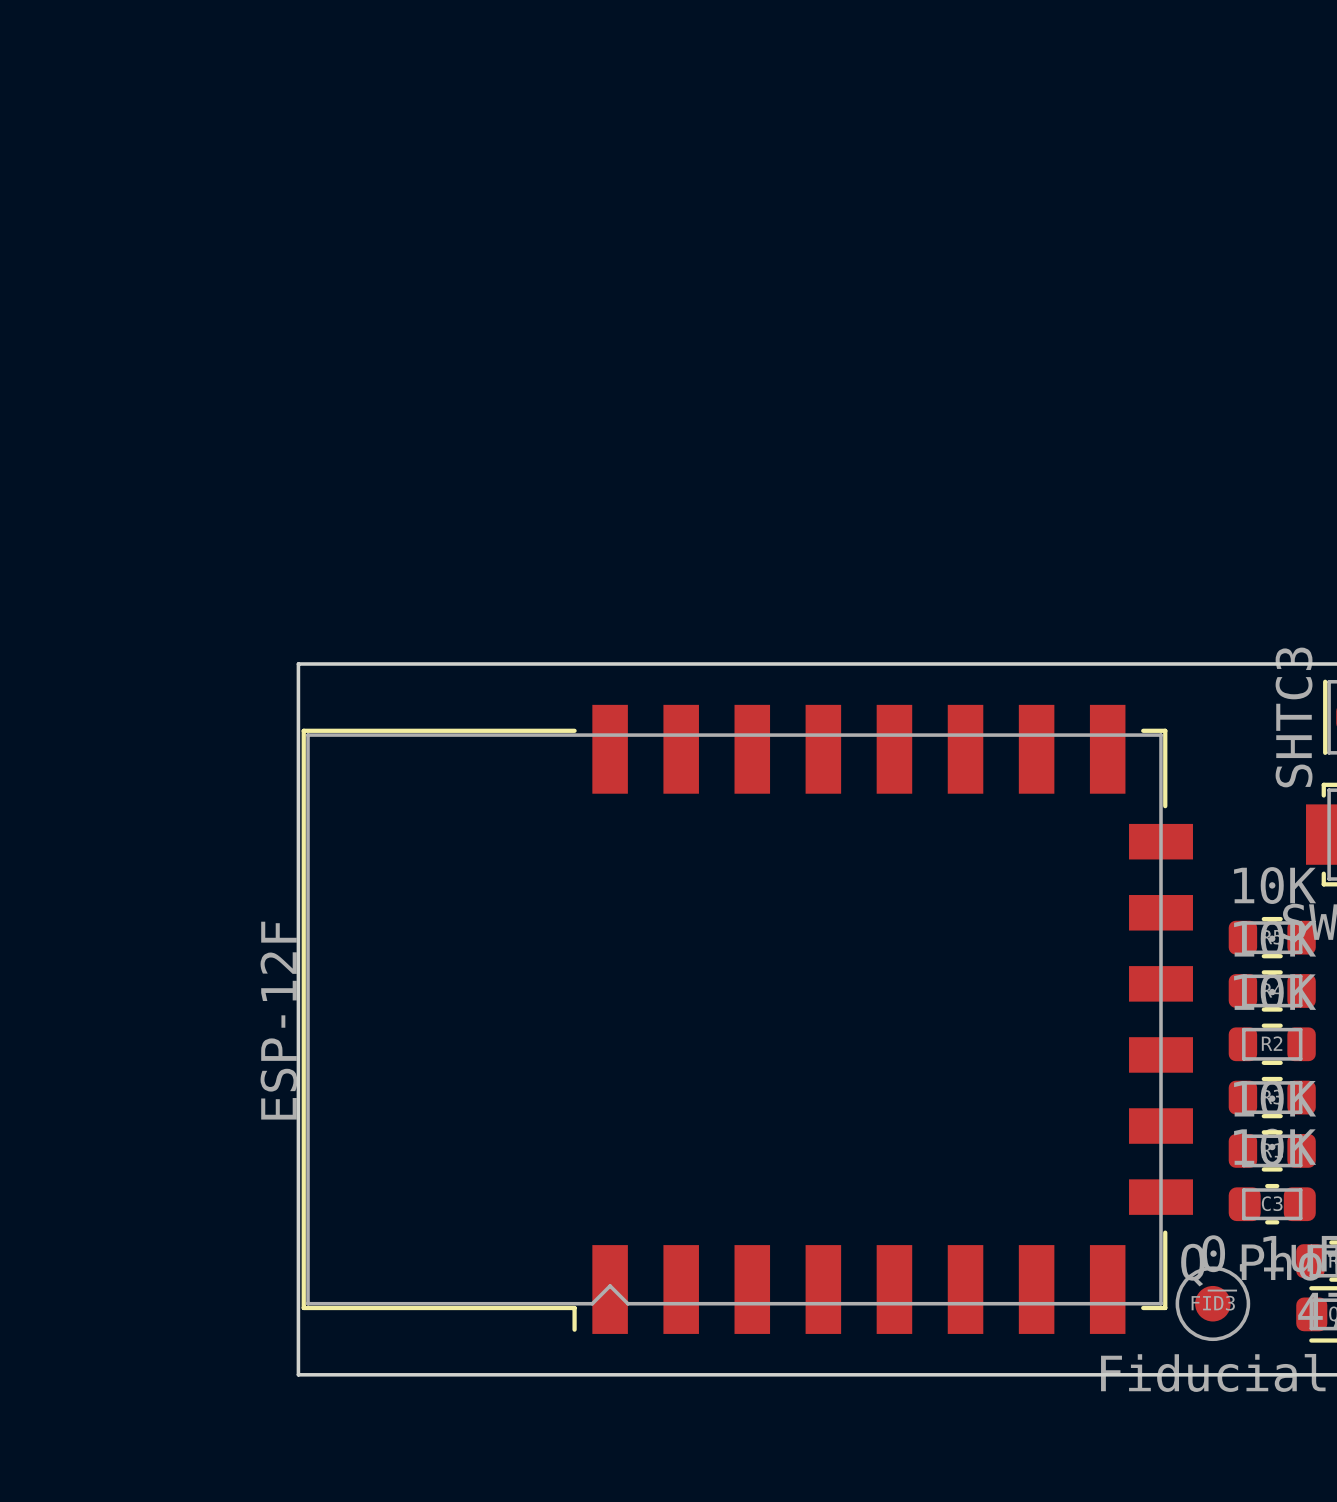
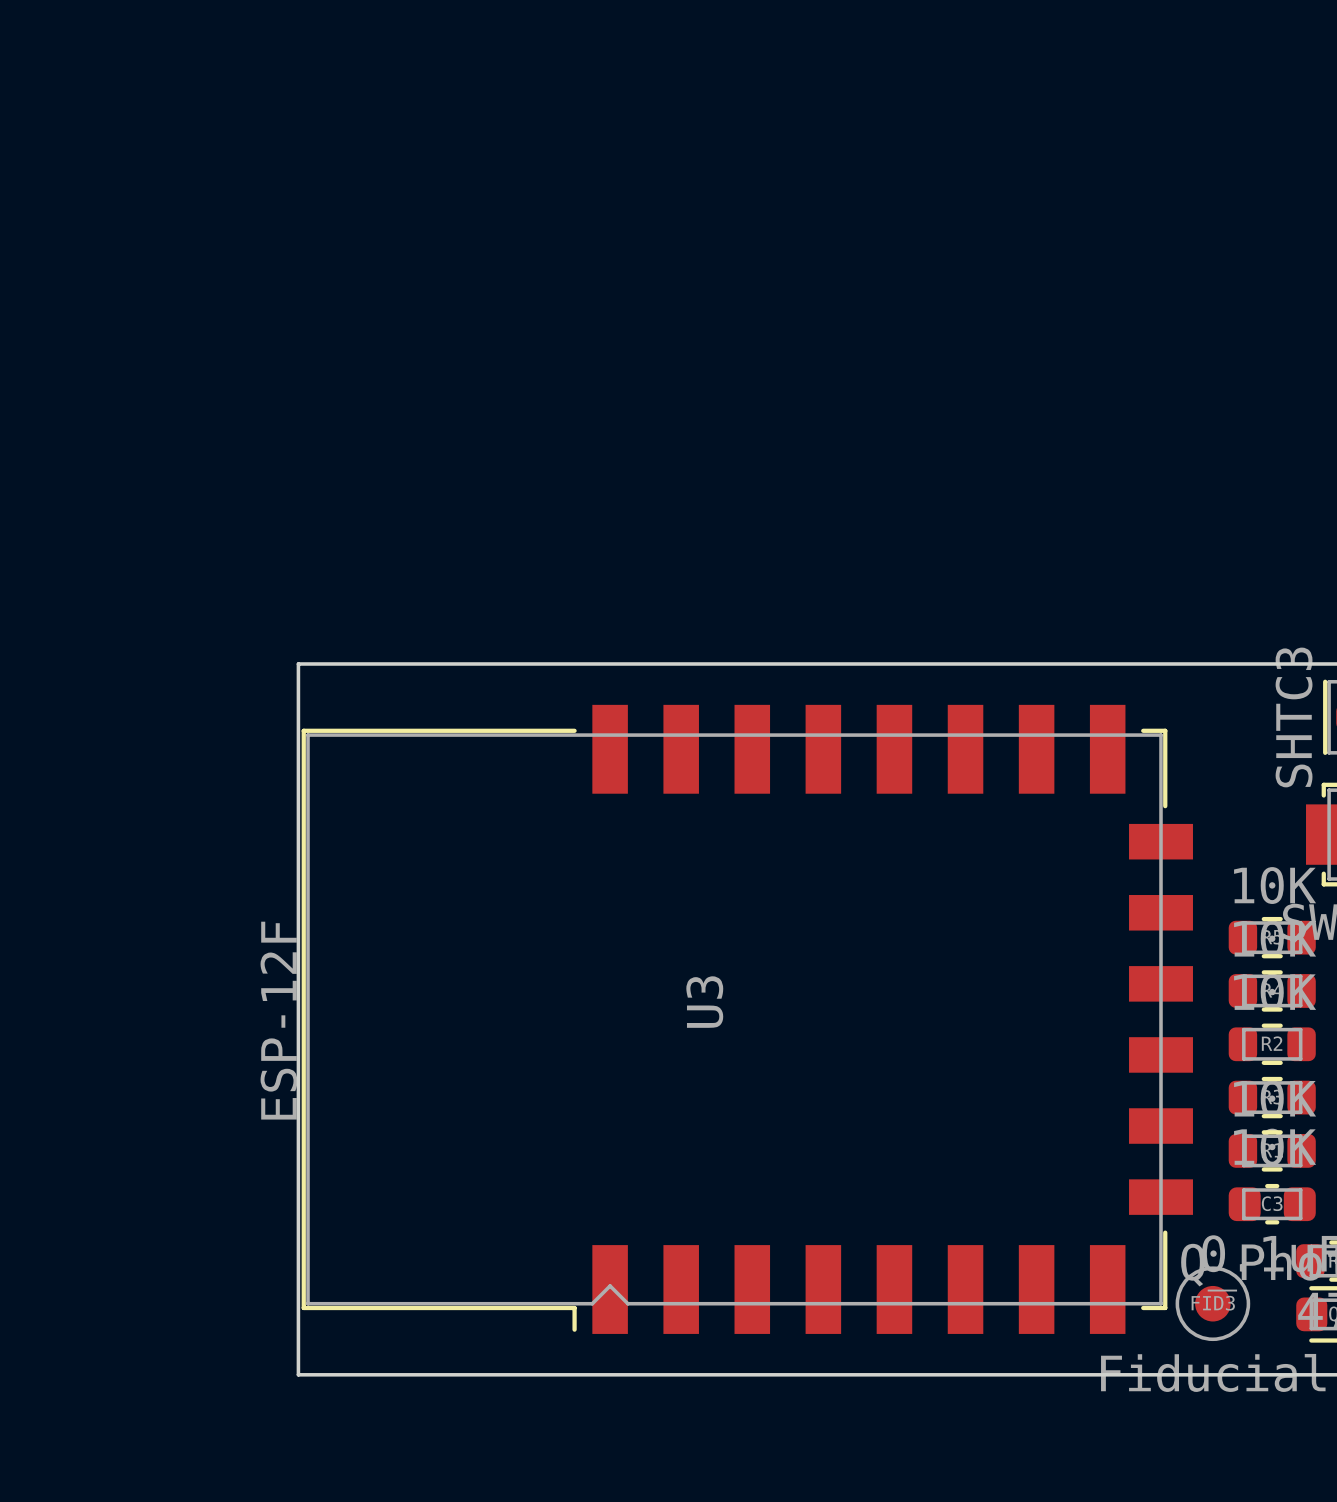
U3 name: none -> U3 (704, 1002)

